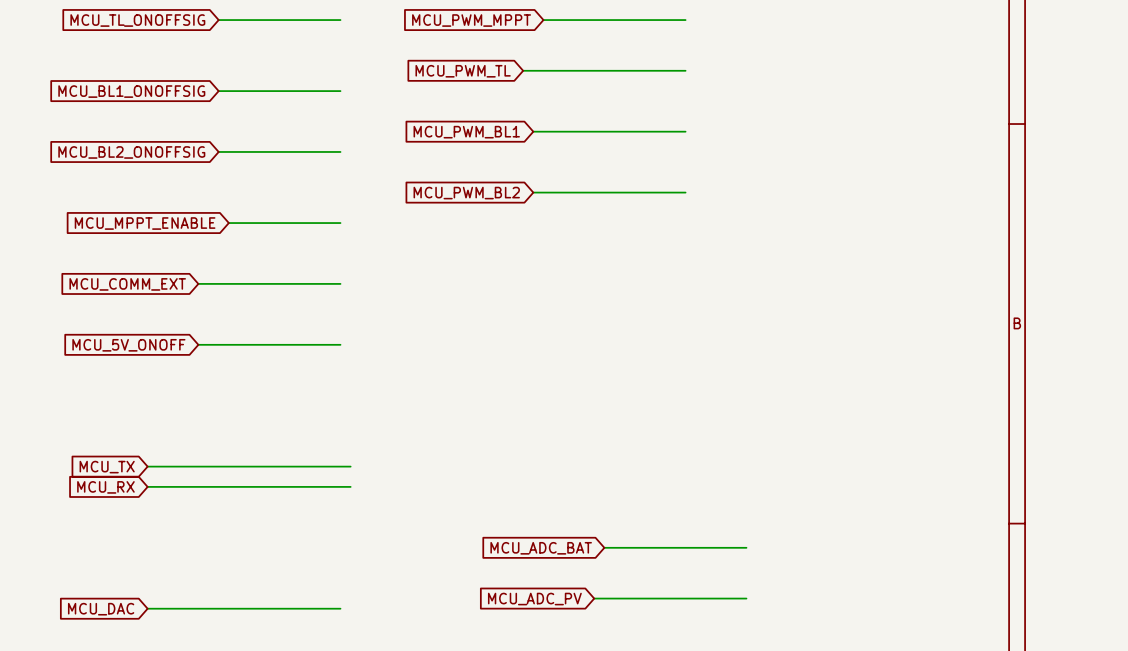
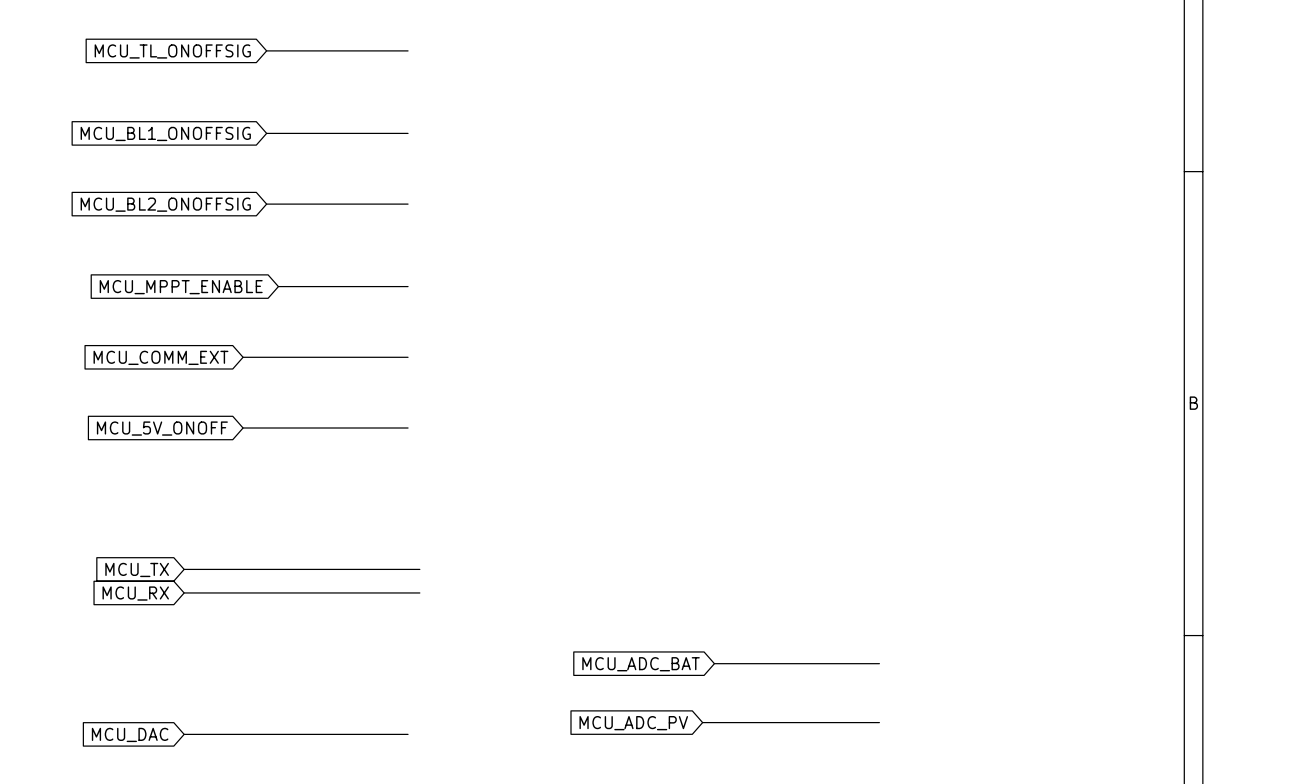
global label: MCU_PWM_MPPT (471, 20) -> none
wire: (543, 20) (685, 20) -> none
wire: (523, 70) (685, 70) -> none
global label: MCU_PWM_TL (463, 71) -> none
wire: (533, 131) (685, 131) -> none
global label: MCU_PWM_BL1 (466, 132) -> none
wire: (533, 192) (685, 192) -> none
global label: MCU_PWM_BL2 (466, 193) -> none

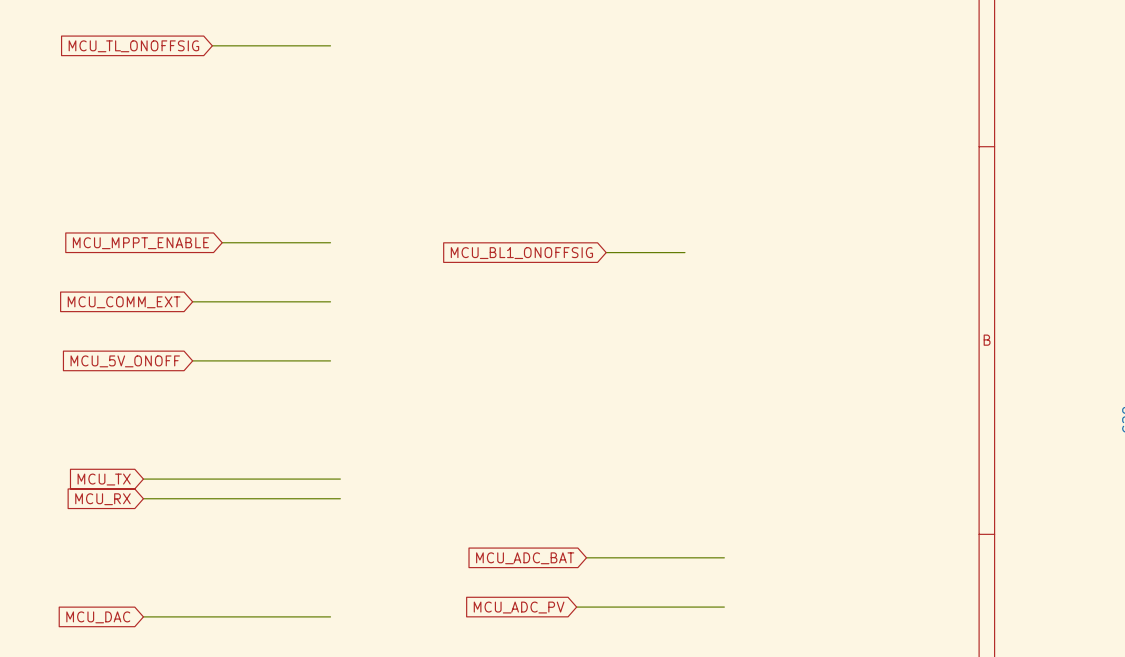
global label: MCU_BL1_ONOFFSIG (165, 133) -> none
wire: (266, 133) (408, 133) -> none
global label: MCU_BL2_ONOFFSIG (165, 204) -> none
wire: (266, 204) (408, 204) -> none
global label: none -> MCU_BL1_ONOFFSIG (521, 253)
wire: none -> (606, 252) (684, 252)

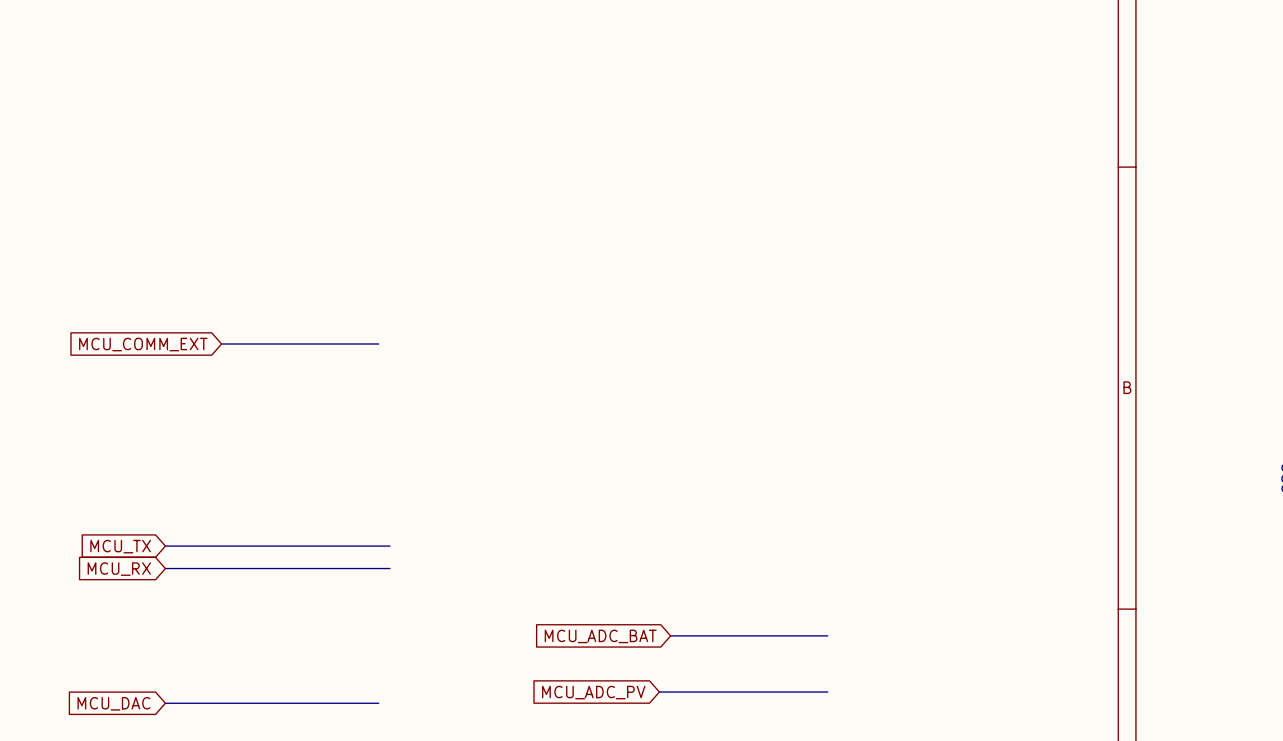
wire: (212, 45) (330, 45) -> none
global label: MCU_TL_ONOFFSIG (133, 46) -> none
wire: (222, 242) (330, 242) -> none
global label: MCU_MPPT_ENABLE (140, 243) -> none
wire: (606, 252) (684, 252) -> none
global label: MCU_BL1_ONOFFSIG (521, 253) -> none
wire: (192, 360) (330, 360) -> none
global label: MCU_5V_ONOFF (125, 361) -> none

